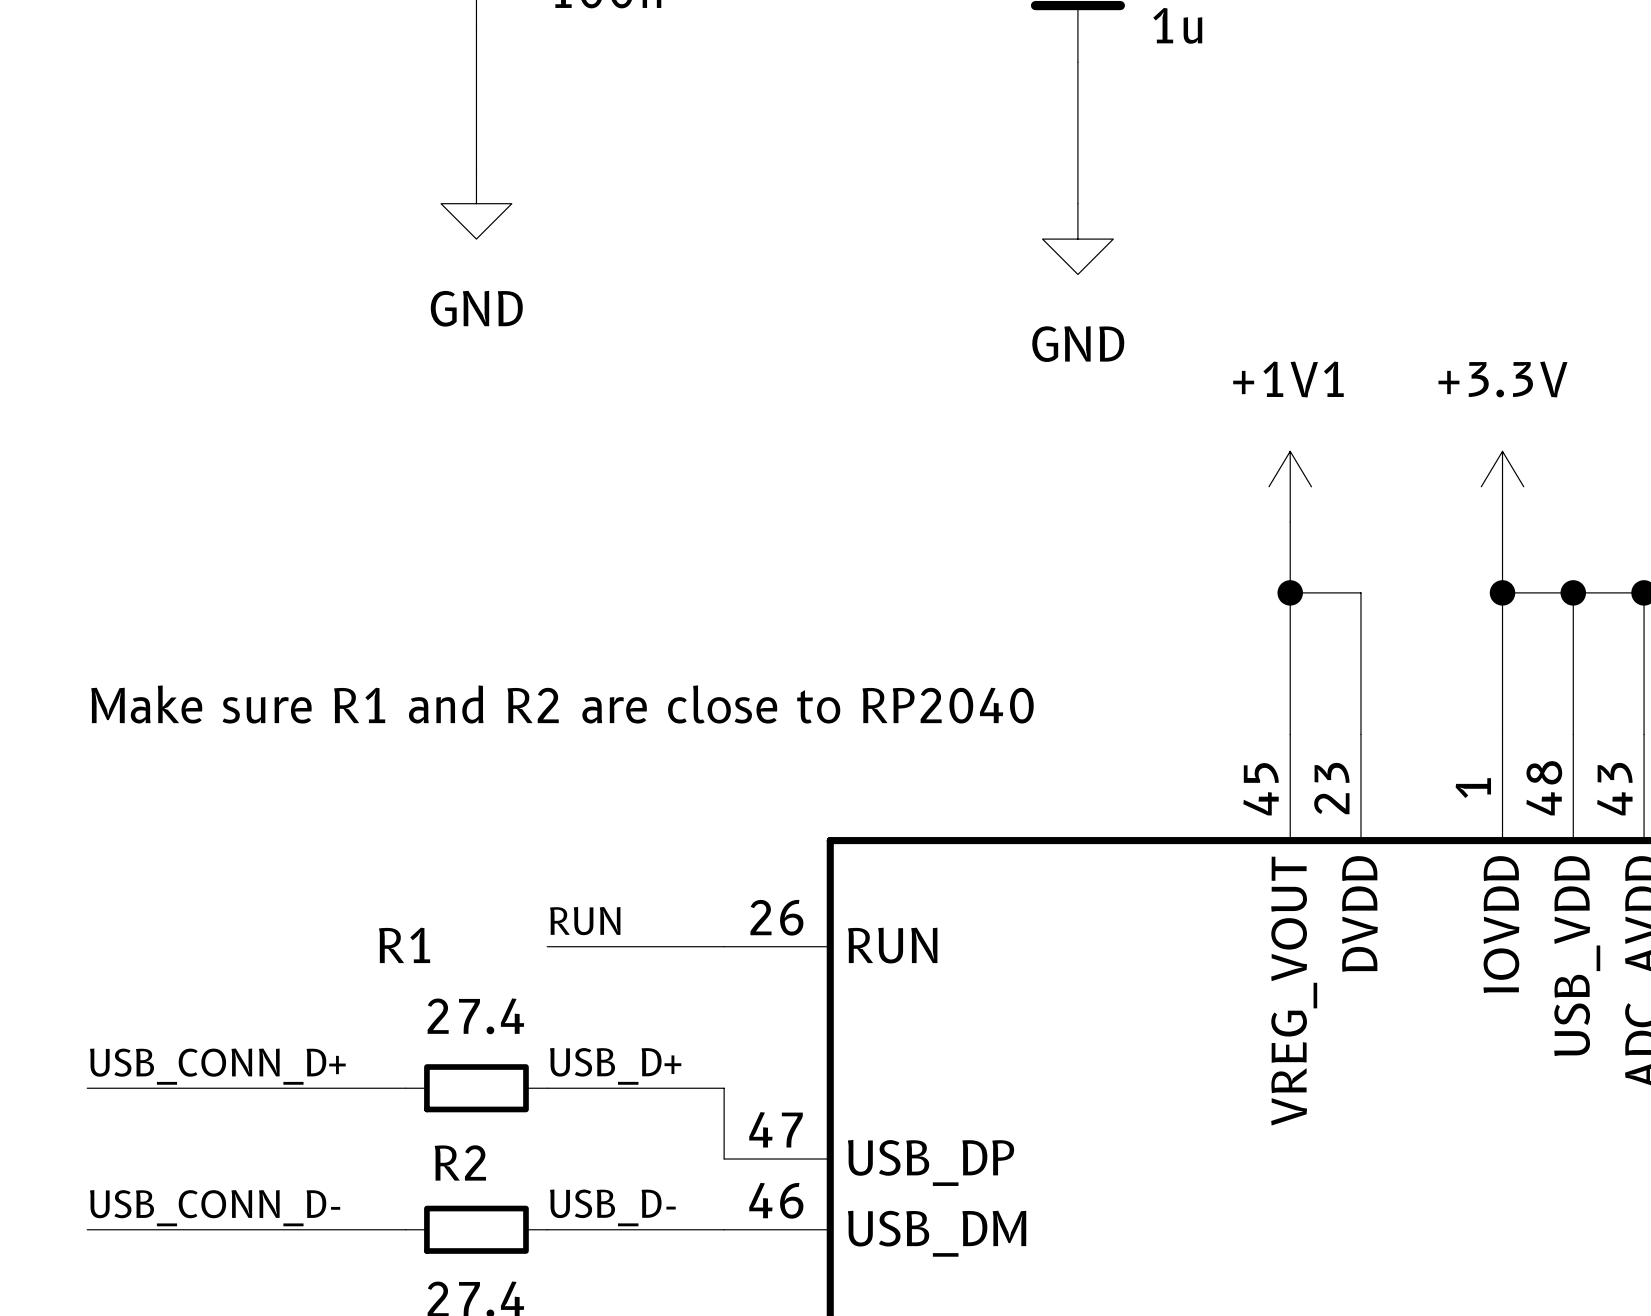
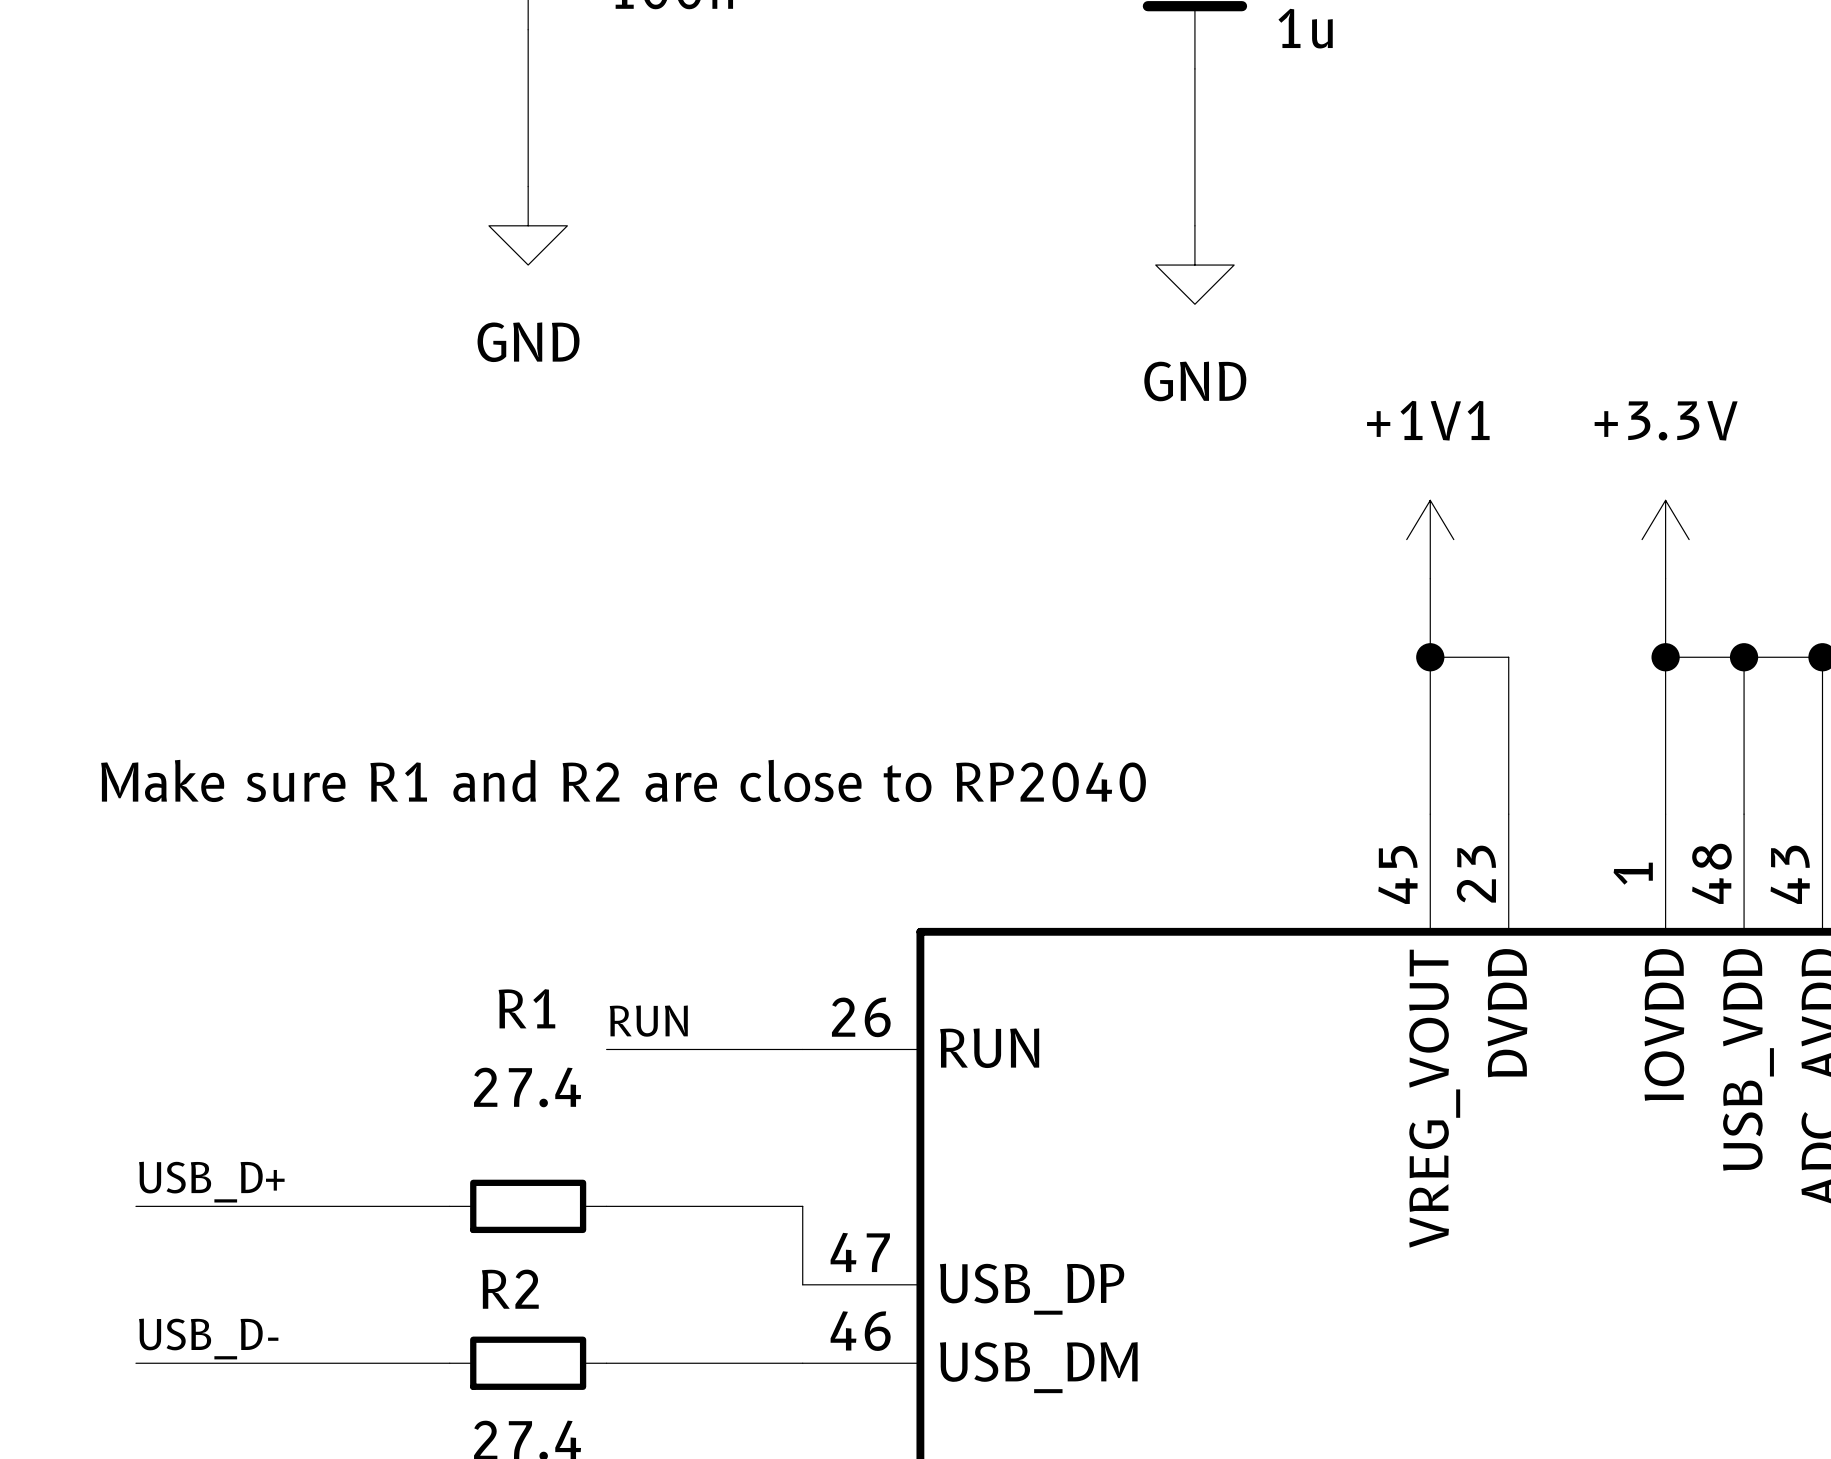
R1 name position: R1 (404, 945) -> R1 (526, 1008)
R1 value position: 27.4 (475, 1016) -> 27.4 (527, 1087)
label: USB_CONN_D+ (217, 1066) -> none
label position: USB_D+ (615, 1066) -> USB_D+ (211, 1182)
wire: (87, 1088) (122, 1088) -> none
label position: USB_D- (612, 1207) -> USB_D- (208, 1339)
label: USB_CONN_D- (215, 1208) -> none
wire: (87, 1229) (122, 1229) -> none

